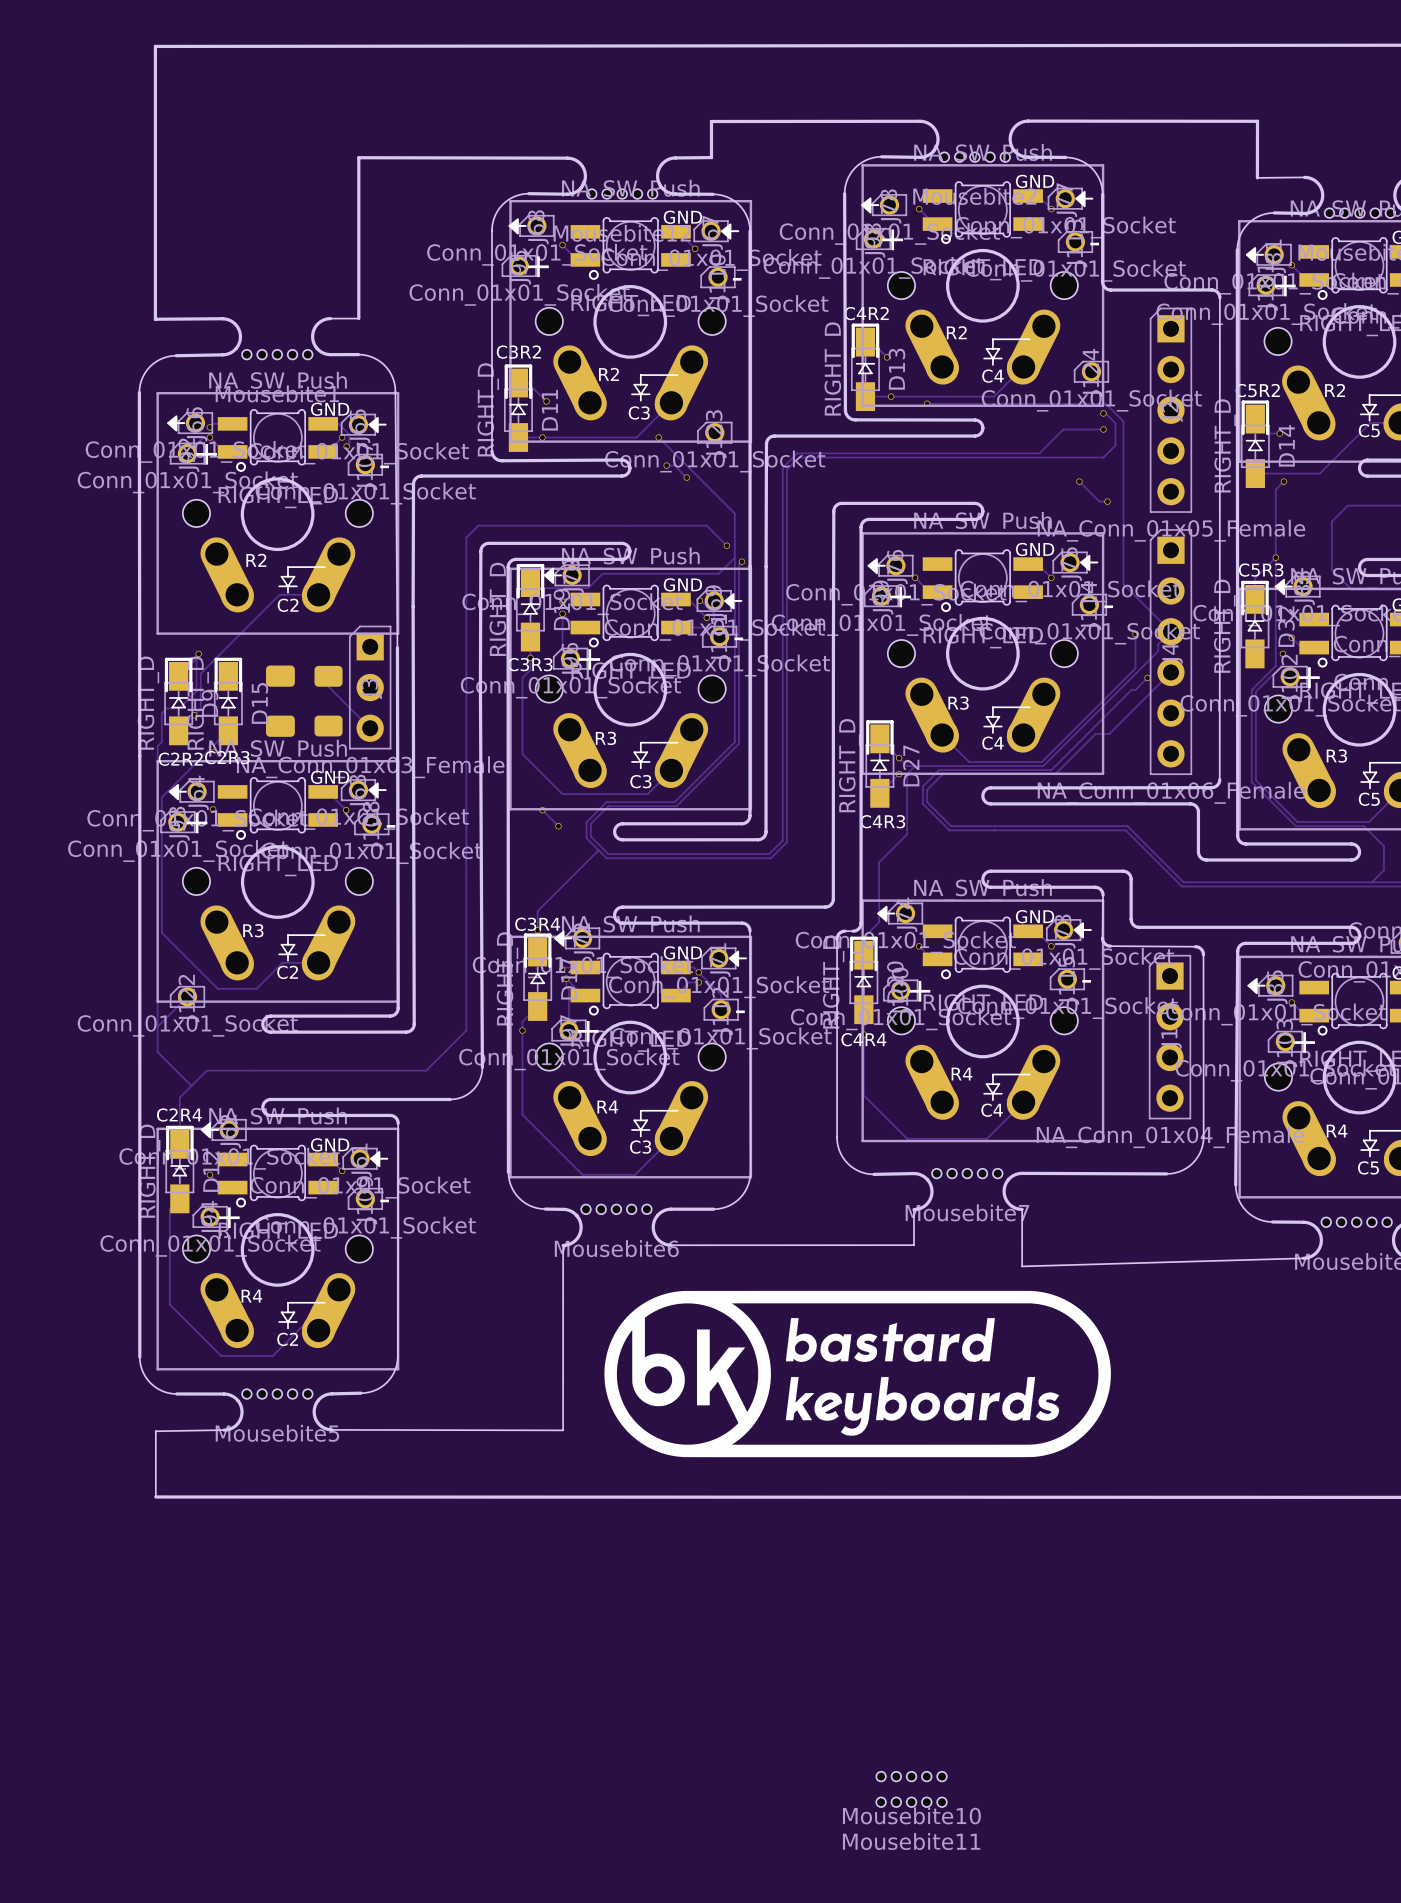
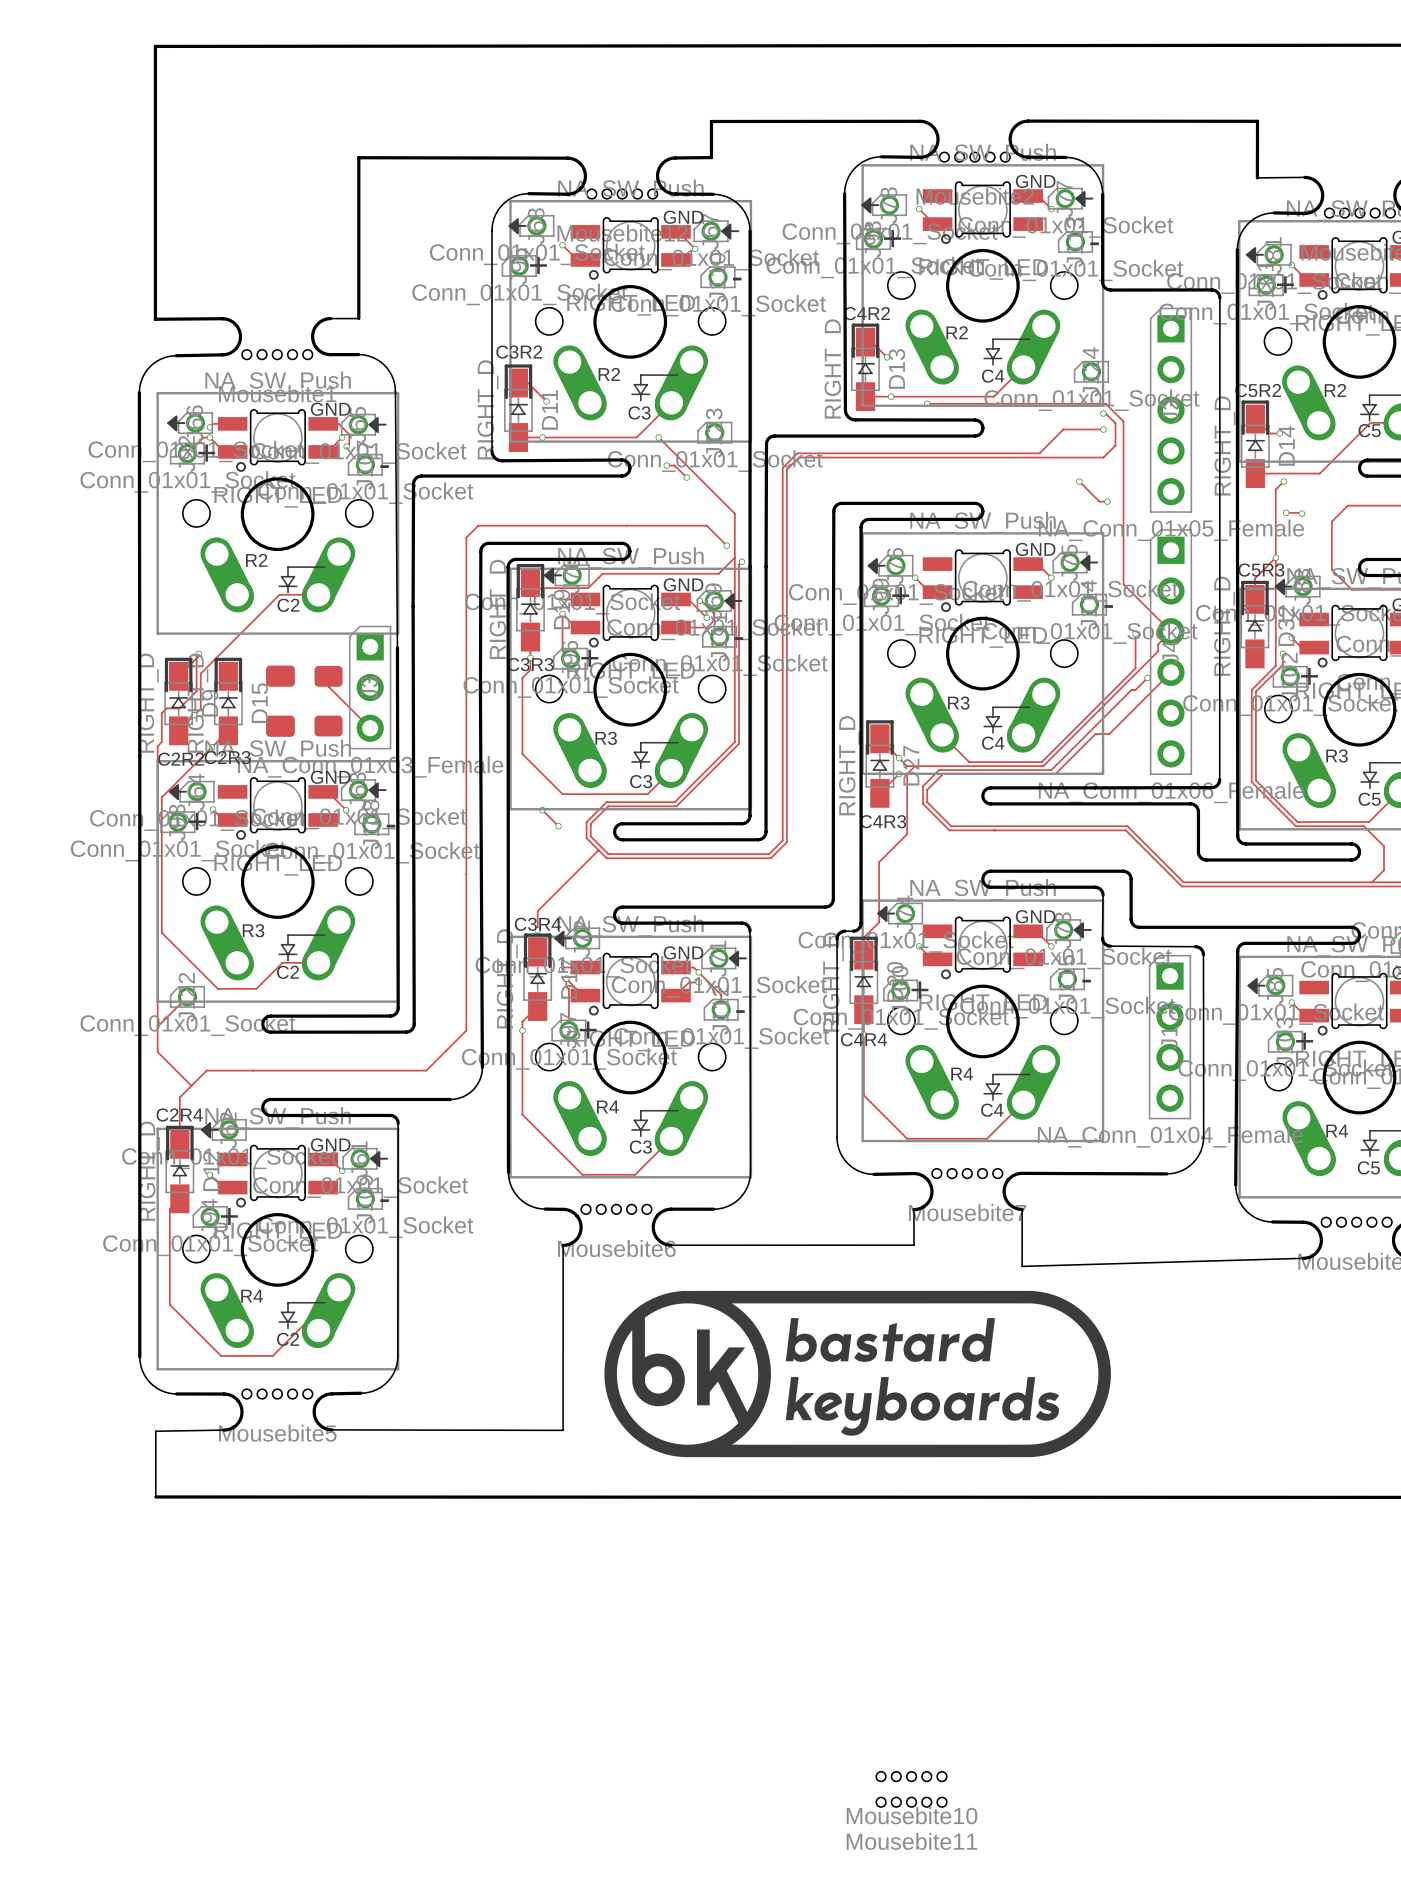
track: none -> (1286, 512) (1301, 513)
via: none -> (1286, 512)
via: none -> (1301, 513)

